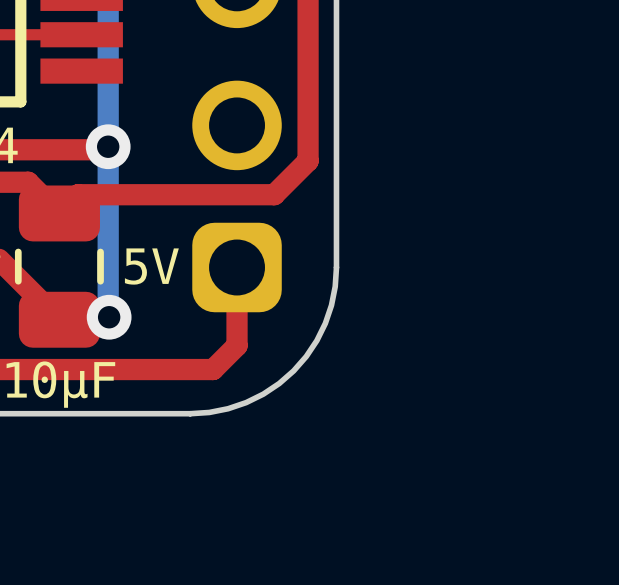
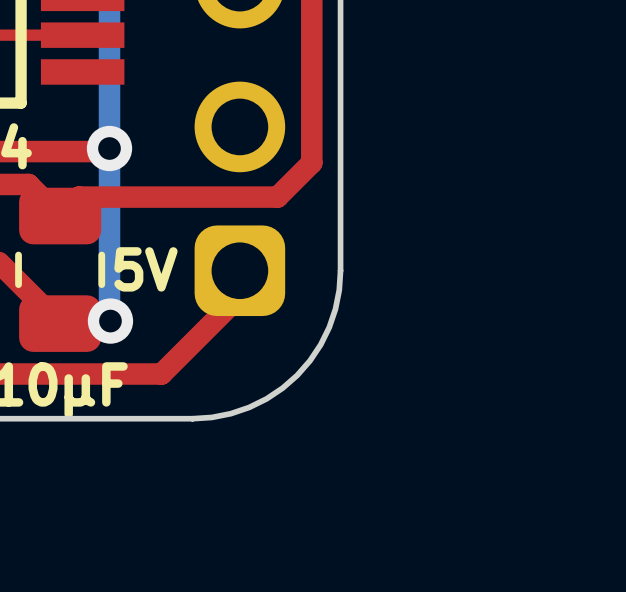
top track: (237, 267) (237, 345) (213, 369) (159, 369) -> (239, 295) (161, 374)

